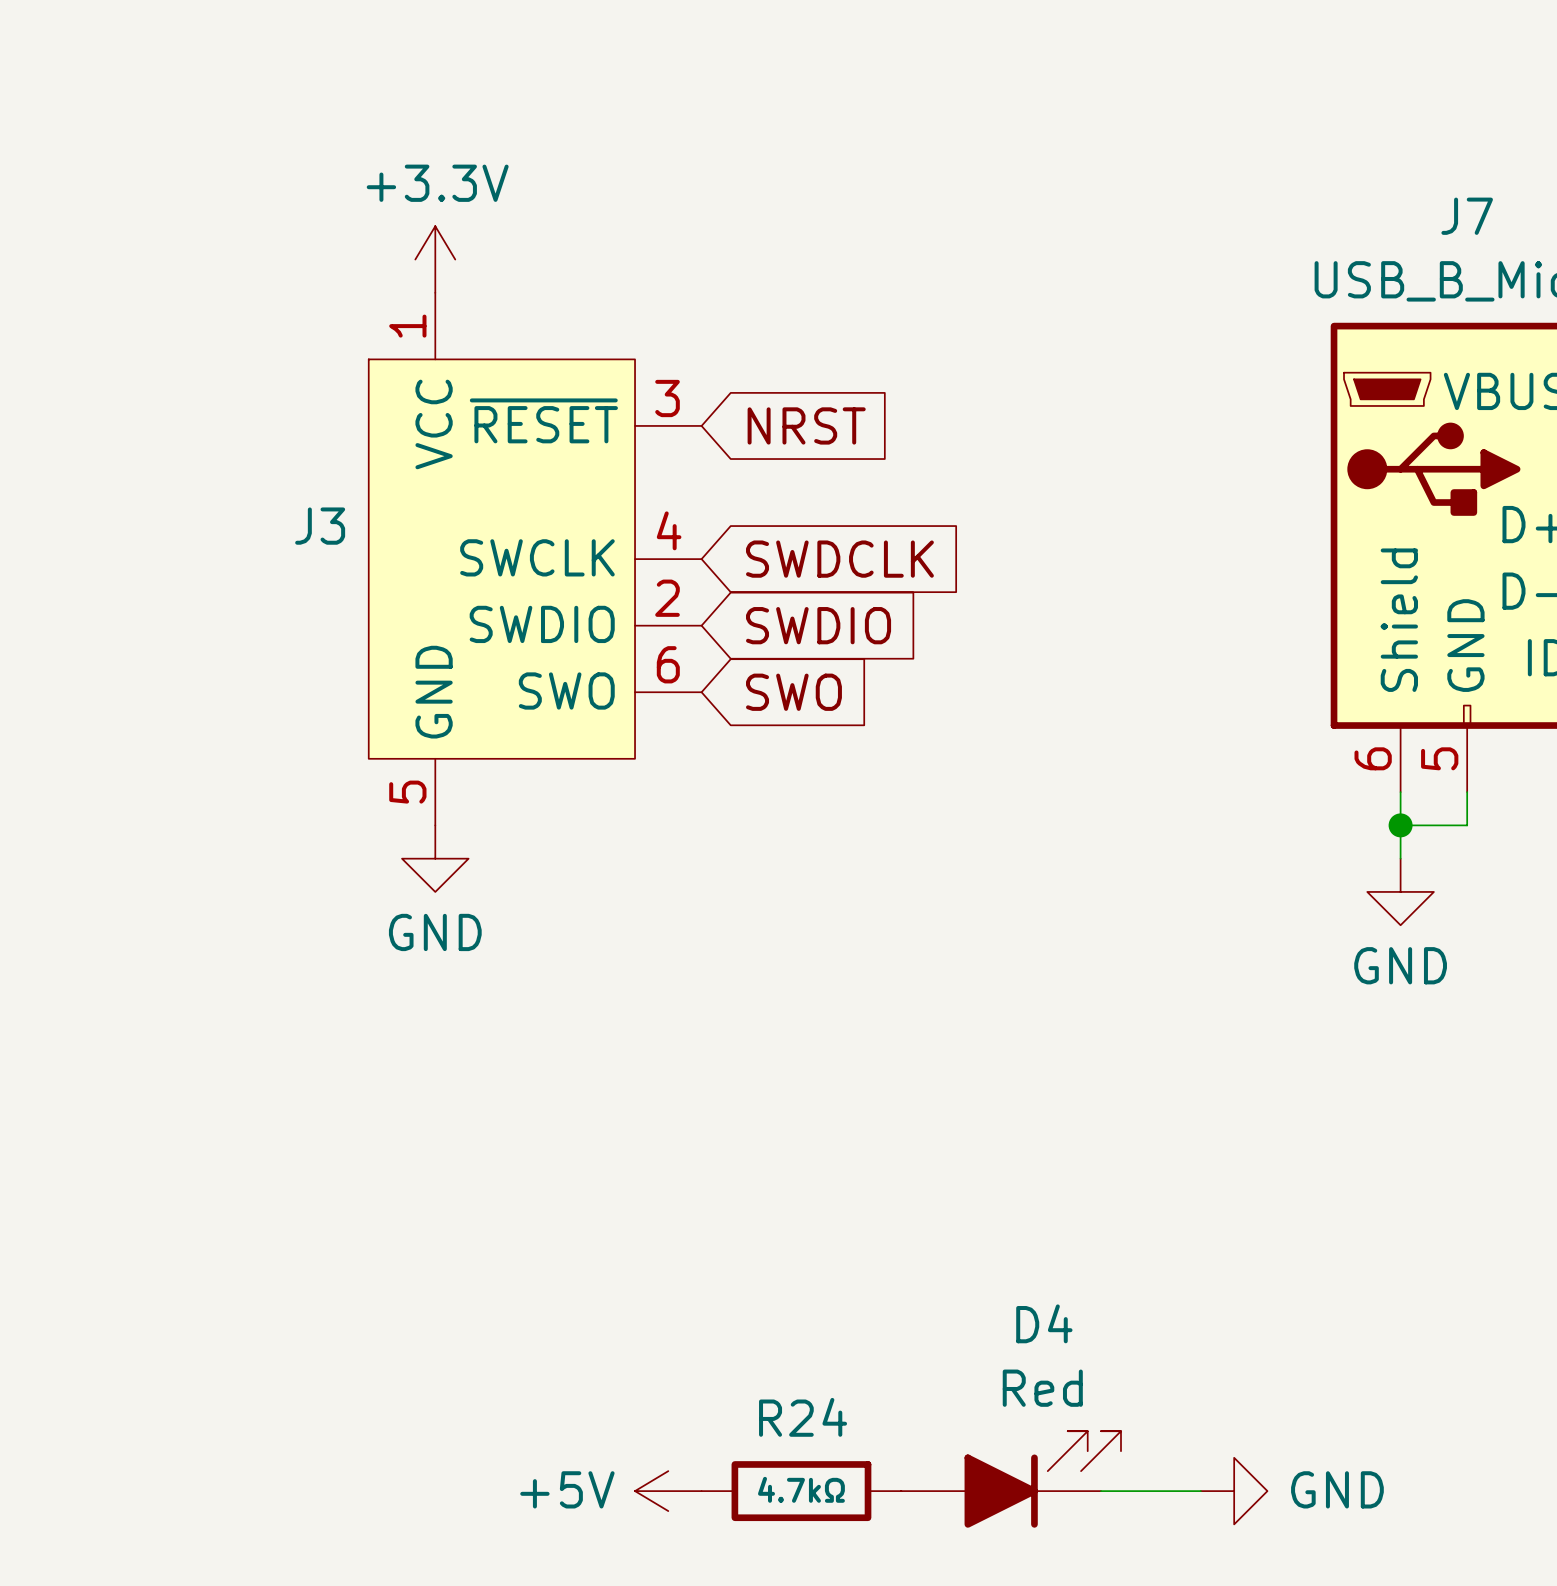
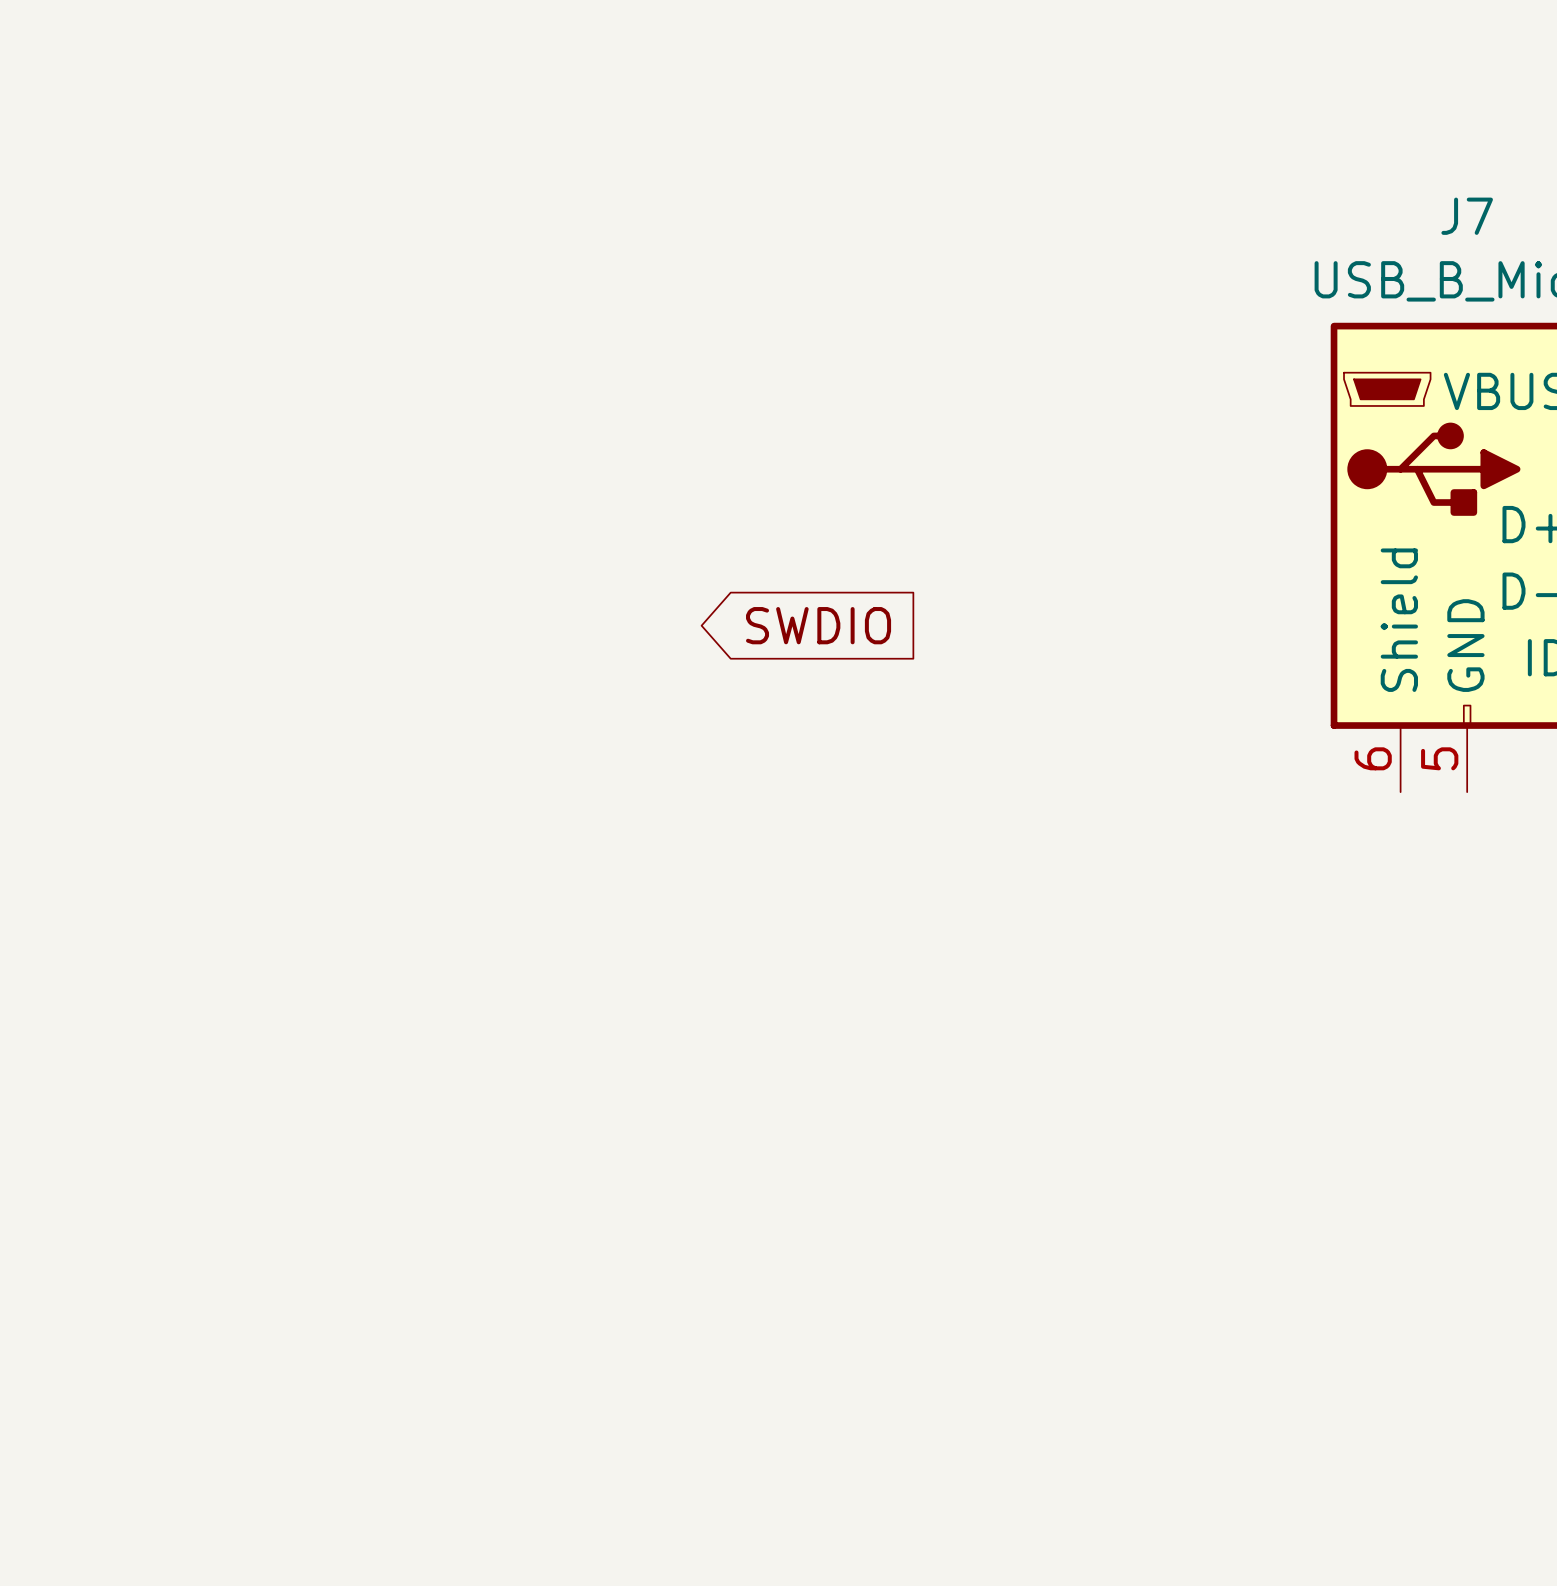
power symbol: +3.3V (435, 259) -> none
global label: NRST (806, 425) -> none
J3: (535, 559) -> none
global label: SWDCLK (839, 559) -> none
global label: SWO (793, 692) -> none
wire: (1400, 792) (1400, 858) -> none
wire: (1467, 792) (1467, 825) (1400, 825) -> none
junction: (1400, 825) -> none
power symbol: GND (435, 858) -> none
power symbol: GND (1400, 891) -> none
D4: Red (1011, 1479) -> none
power symbol: +5V (668, 1491) -> none
R24: 4.7kΩ (801, 1491) -> none
wire: (1101, 1491) (1200, 1491) -> none
power symbol: GND (1234, 1491) -> none

